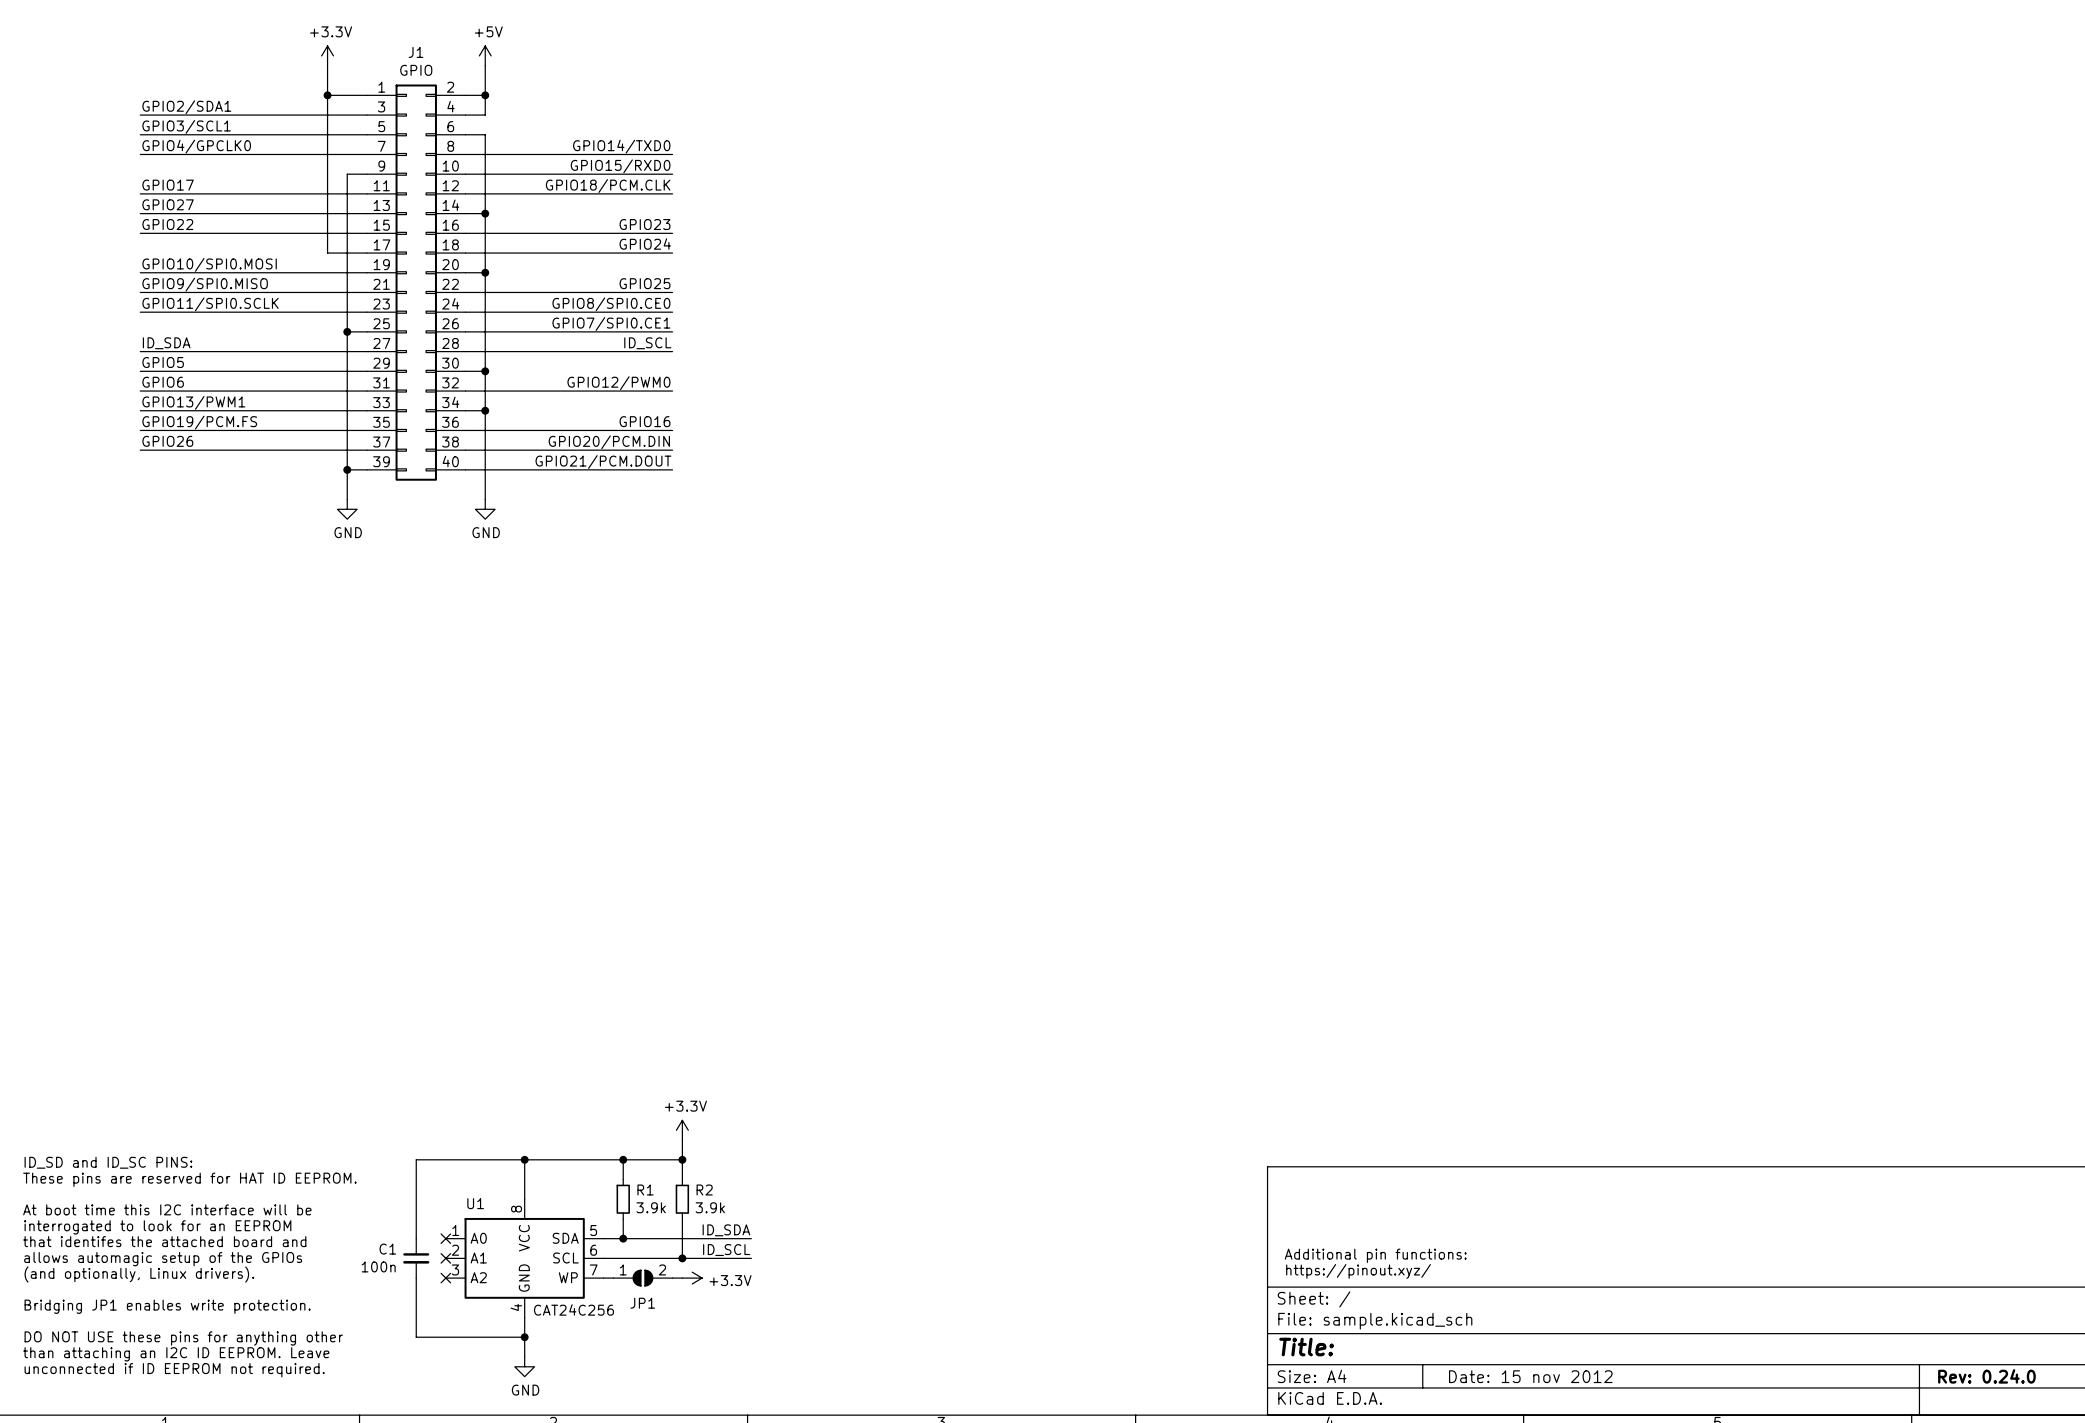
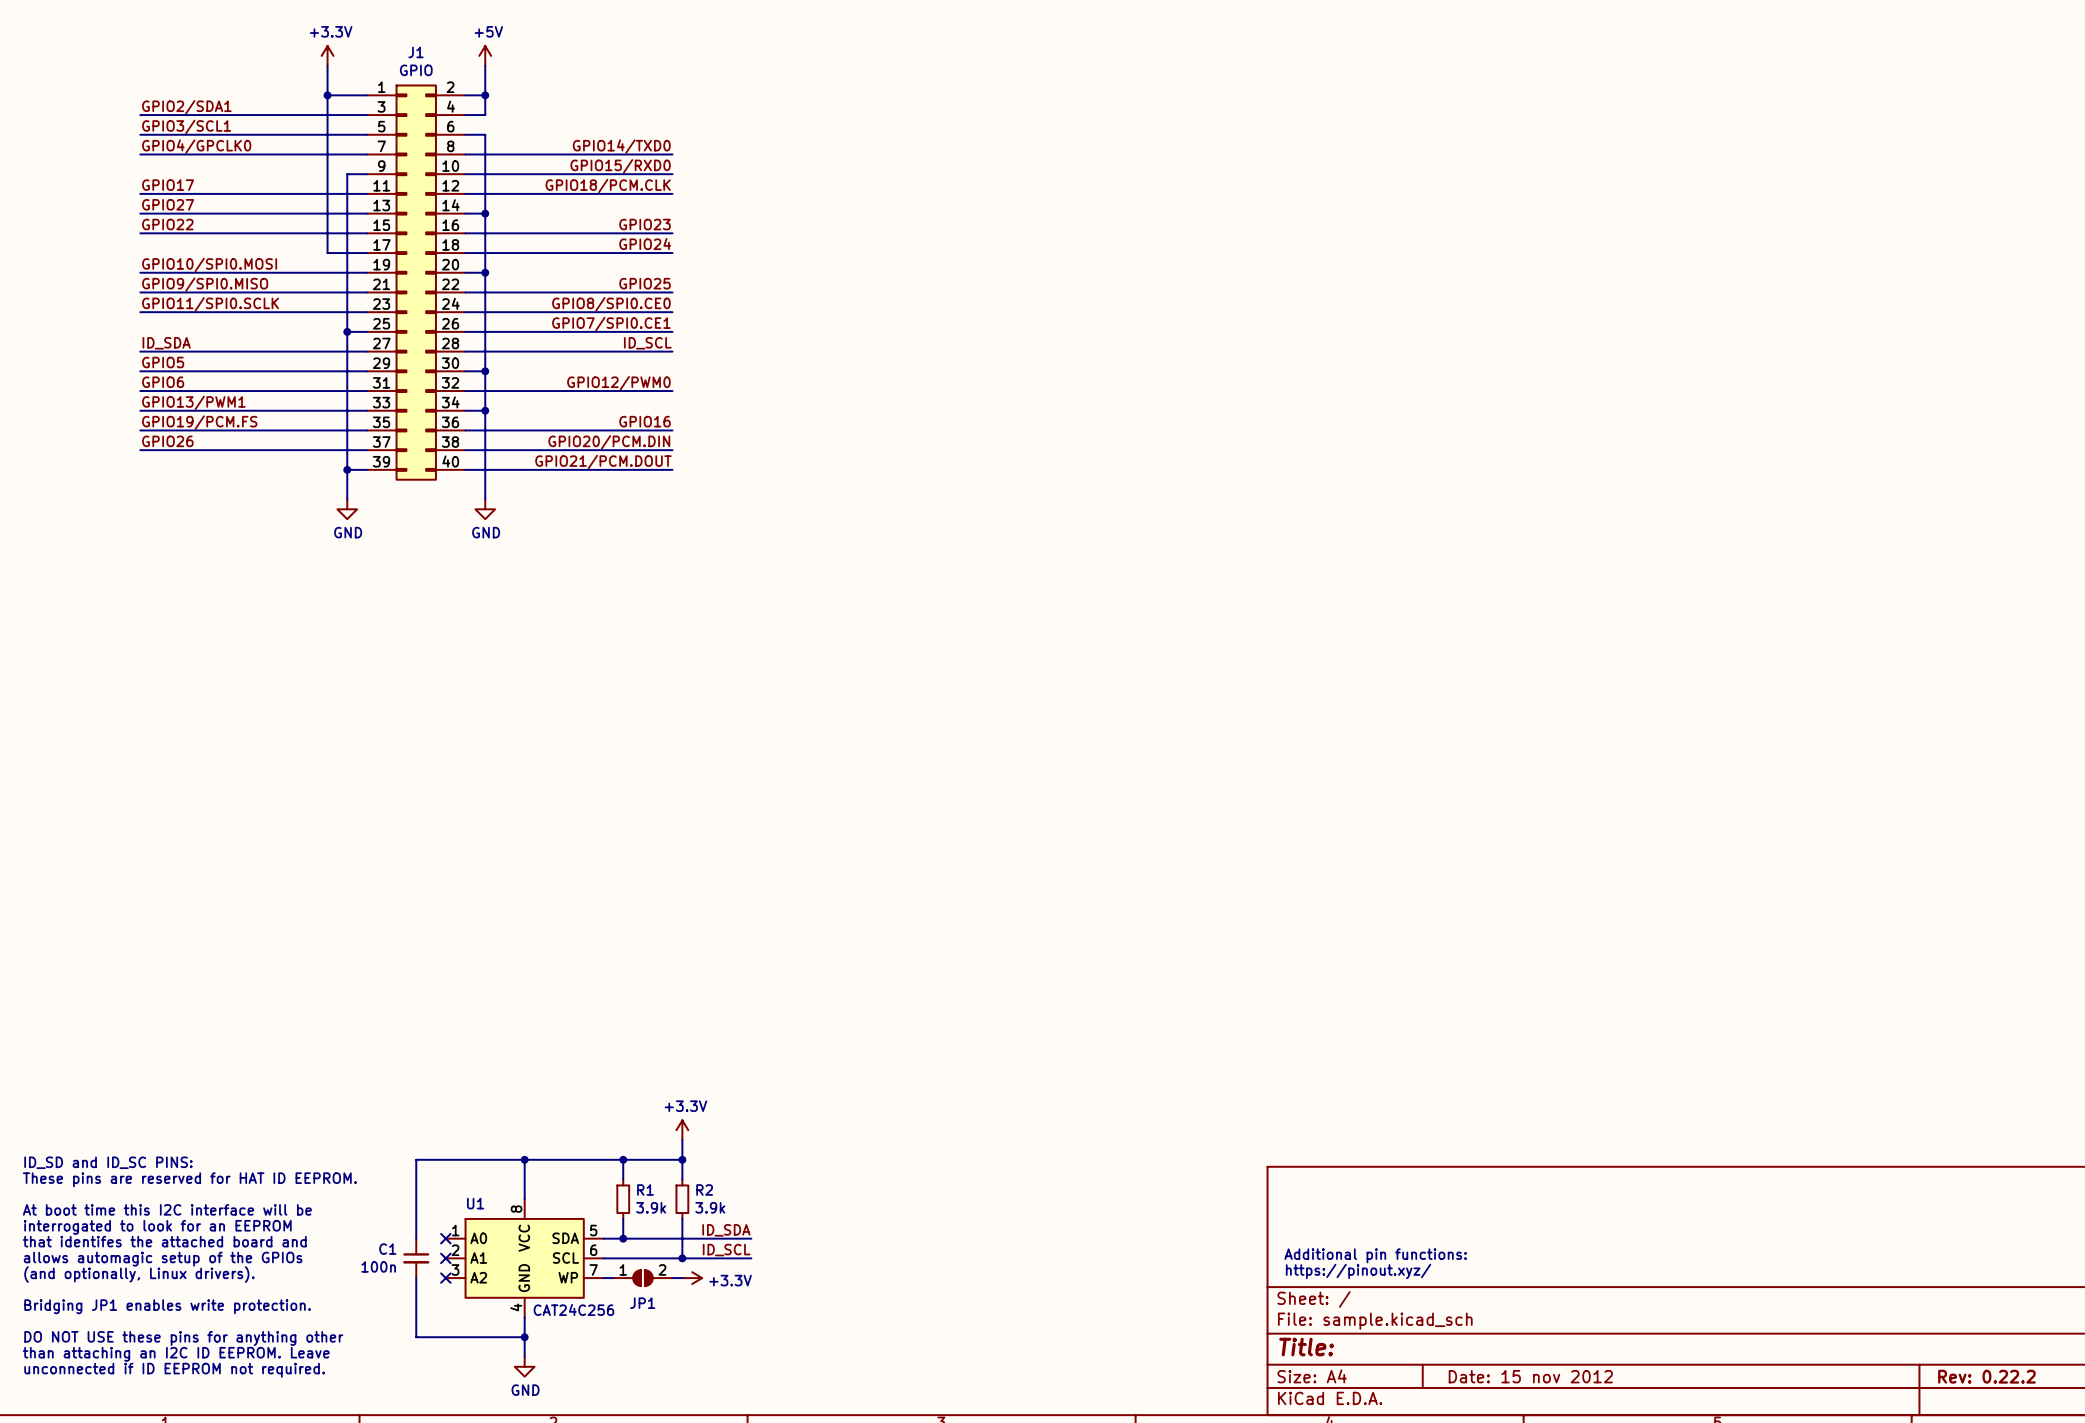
title block: Rev: 0.24.0 (1986, 1376) -> Rev: 0.22.2 (1986, 1376)

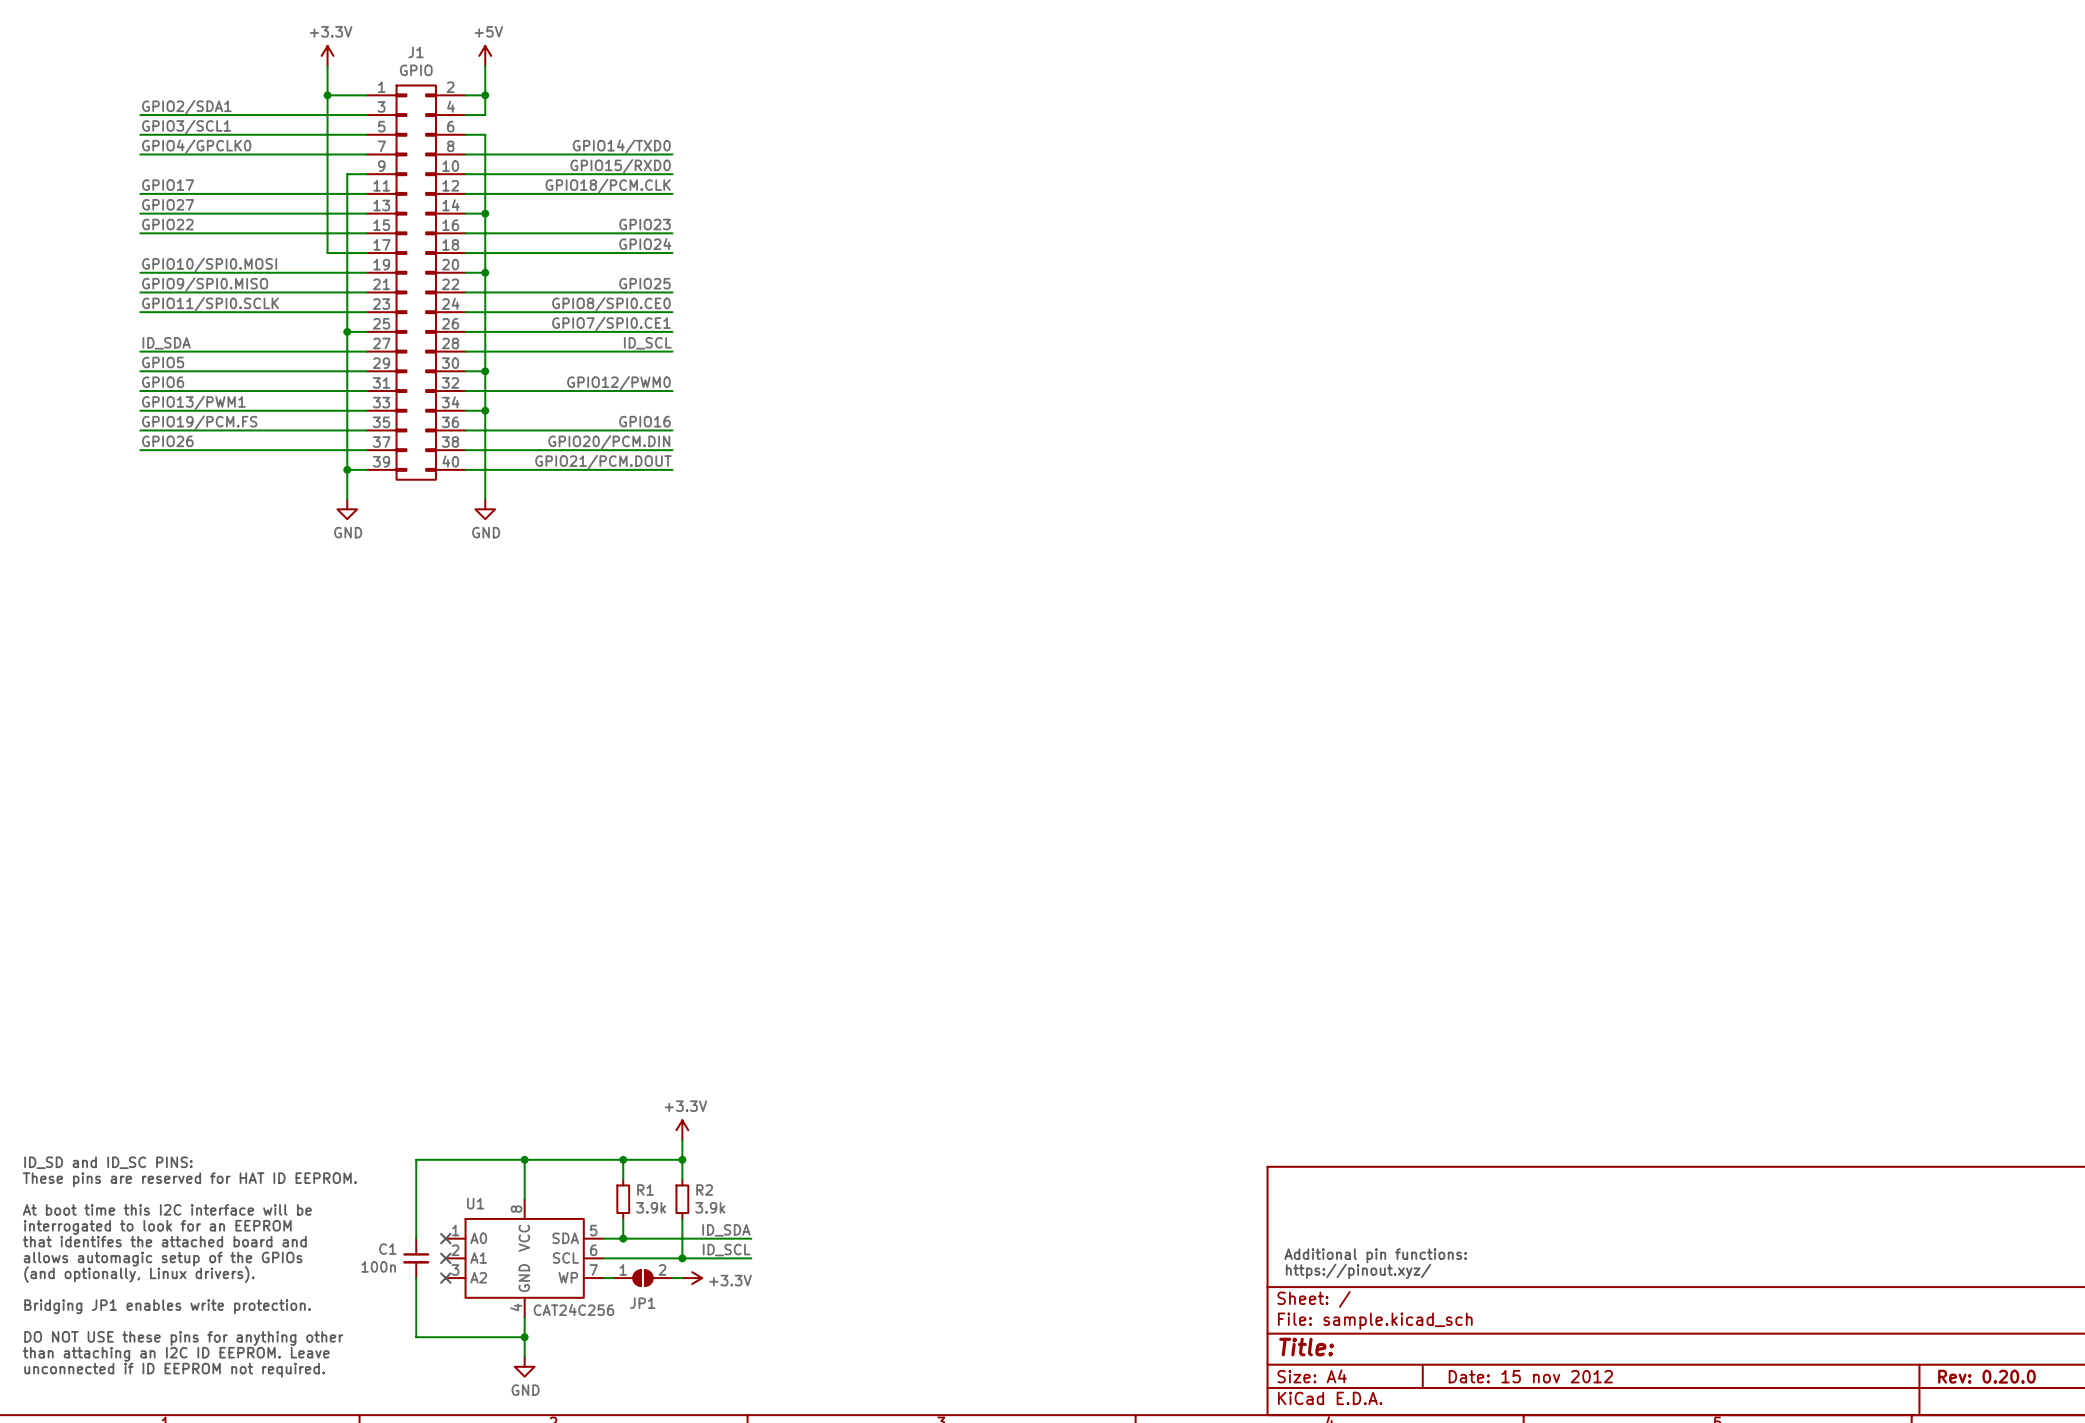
title block: Rev: 0.22.2 (1986, 1376) -> Rev: 0.20.0 (1986, 1376)

